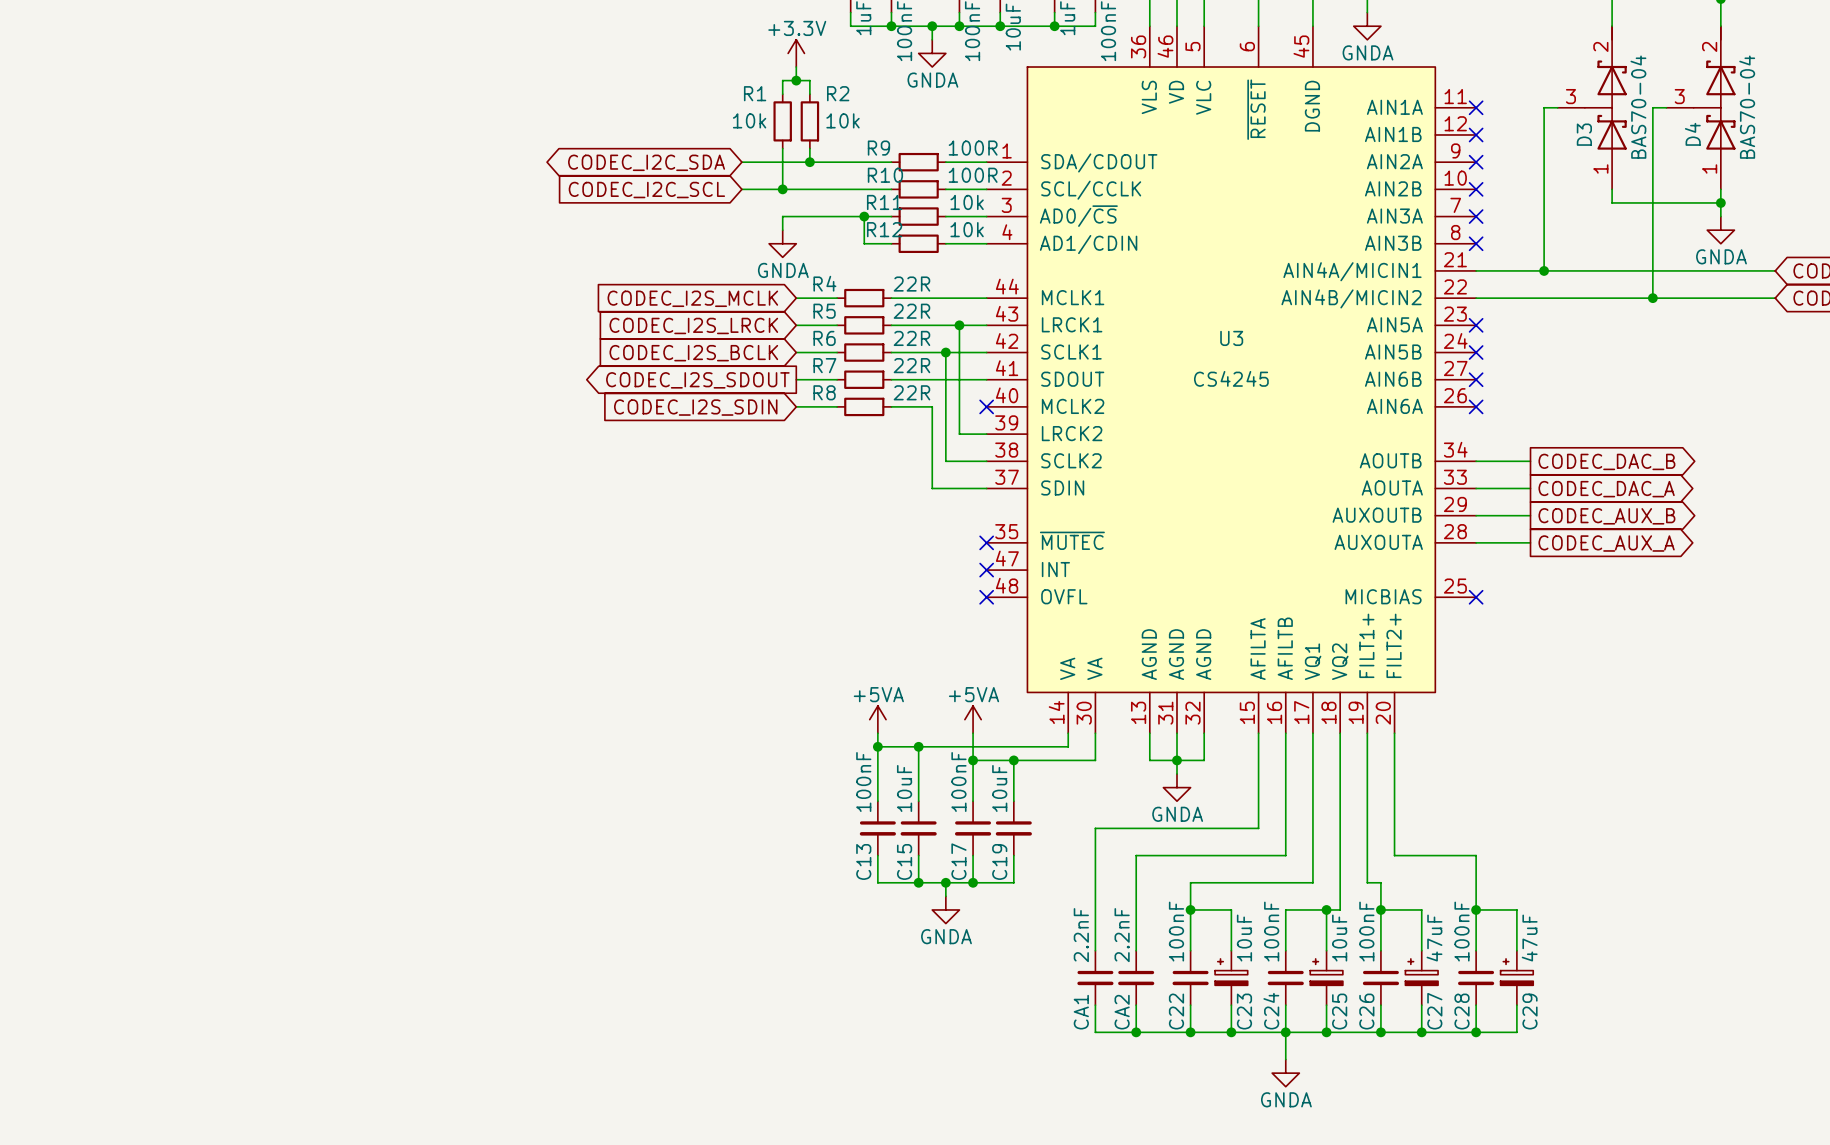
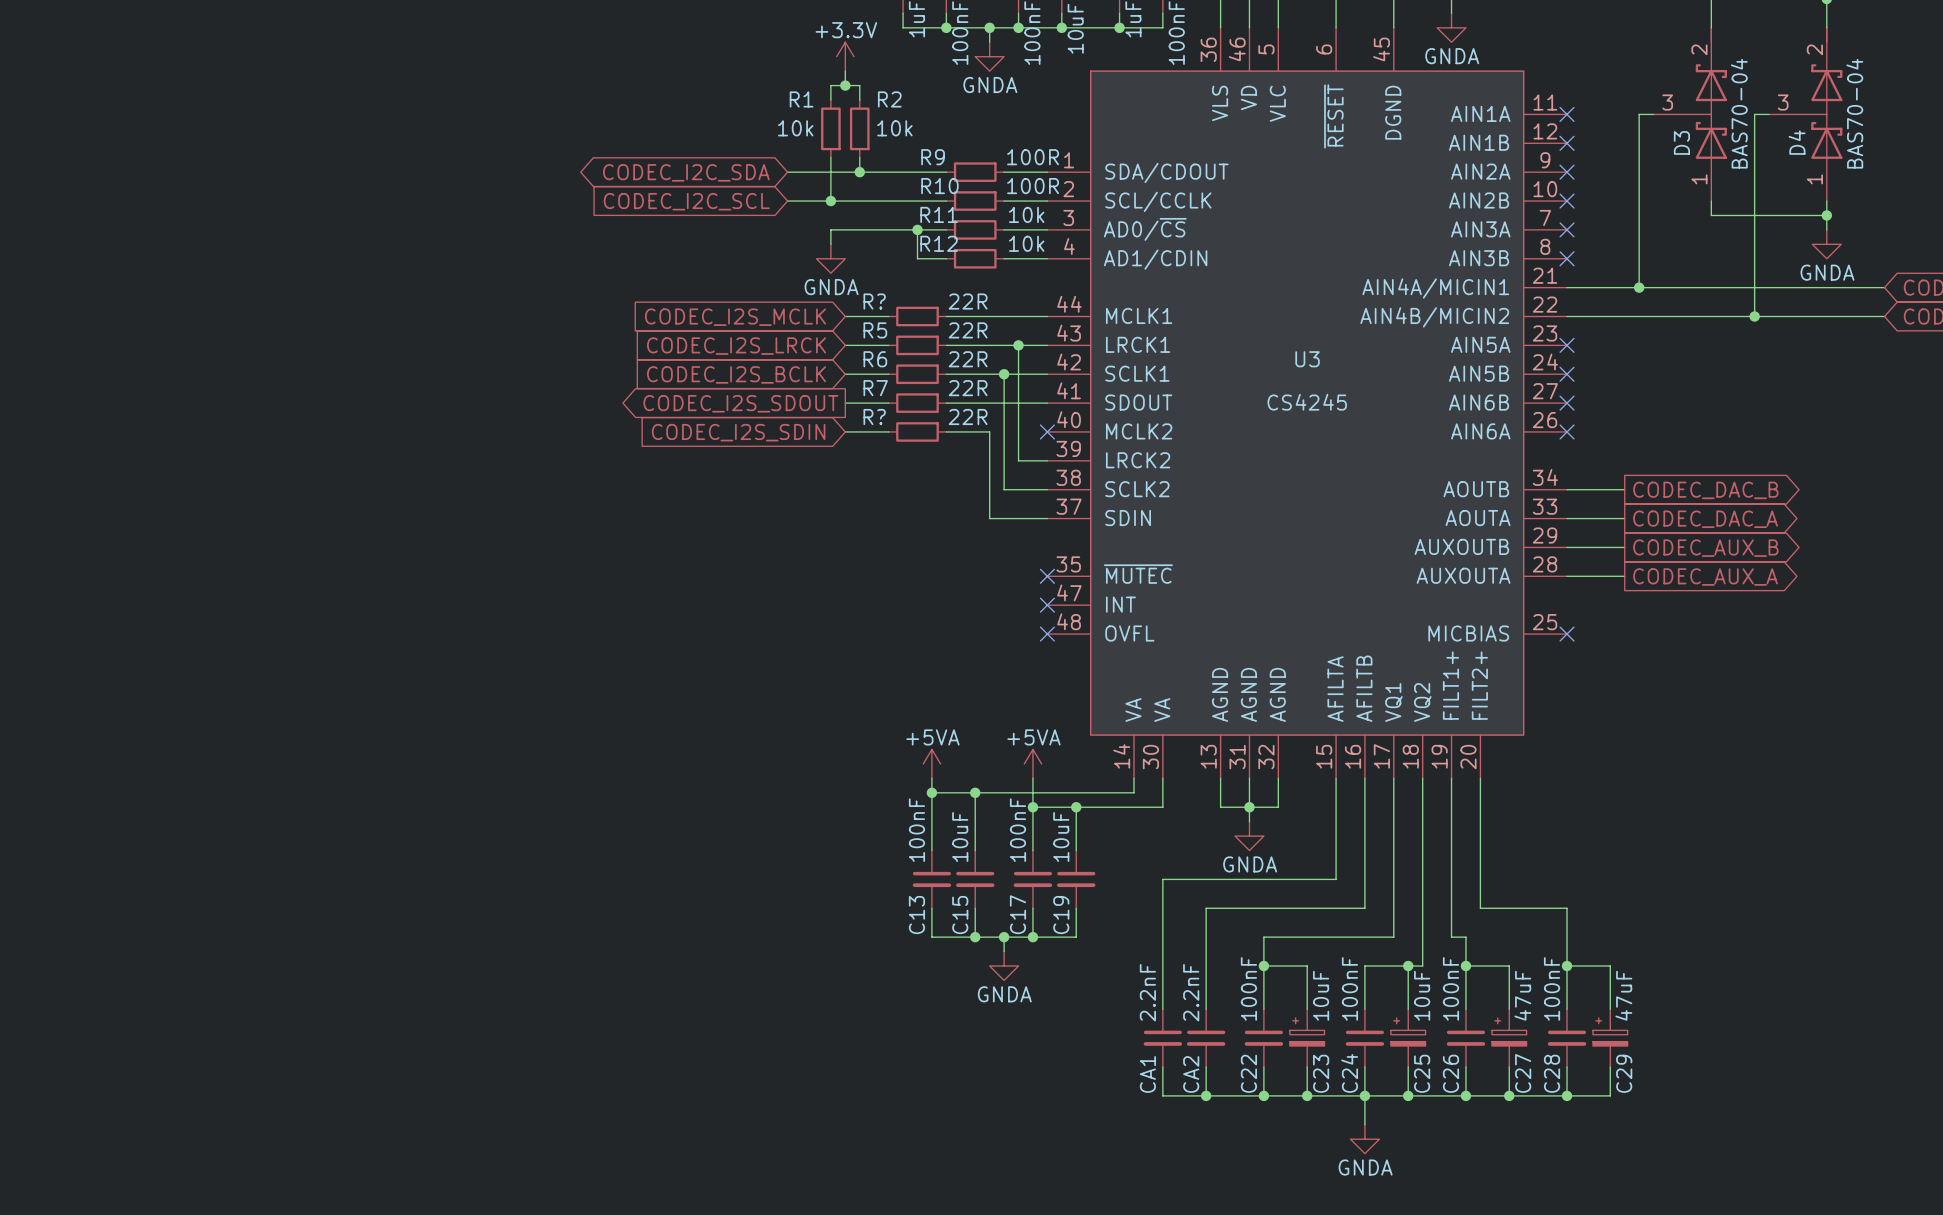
R4 name: R4 (824, 283) -> R? (874, 301)
R8 name: R8 (824, 392) -> R? (874, 416)

